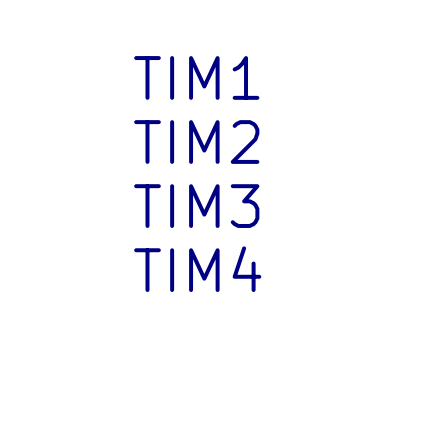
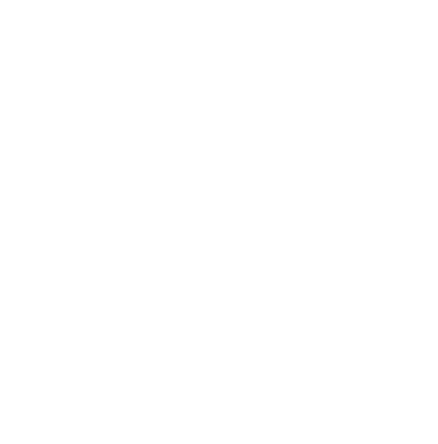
text: TIM1 (196, 77) -> none
text: TIM2 (196, 142) -> none
text: TIM3 (196, 206) -> none
text: TIM4 (197, 269) -> none

